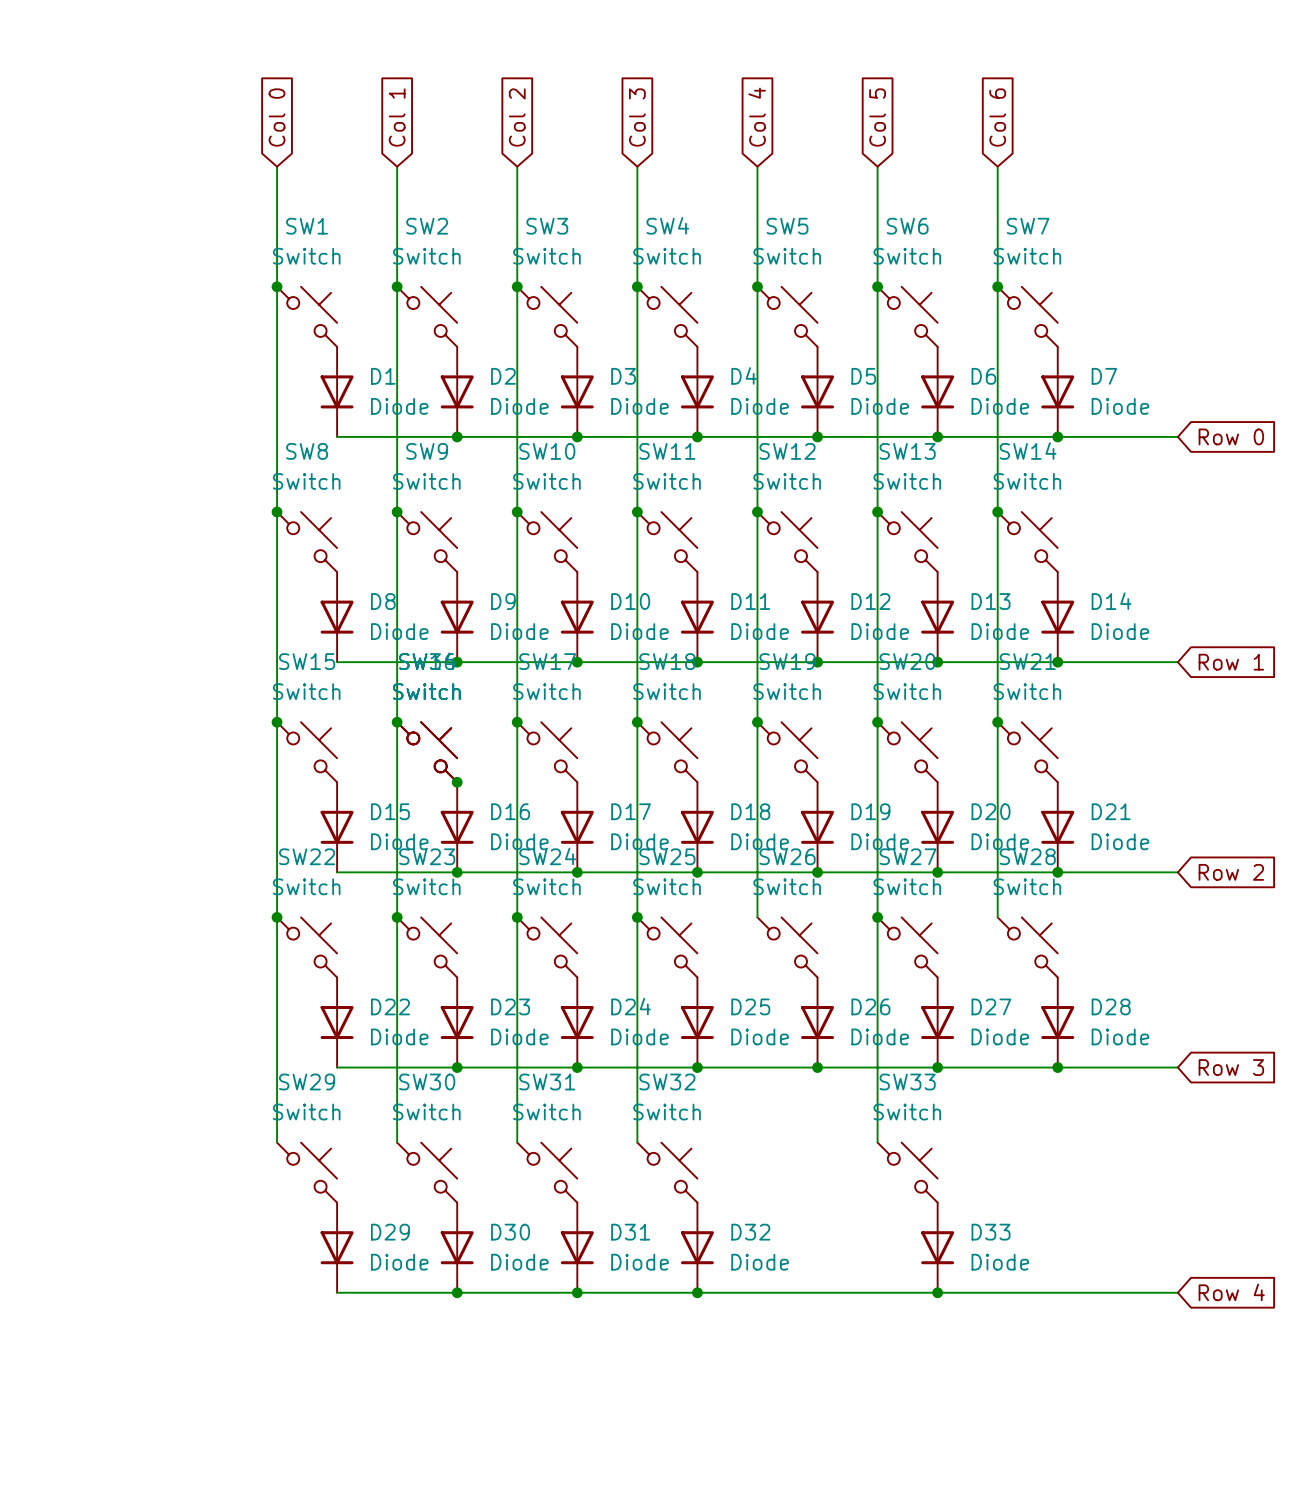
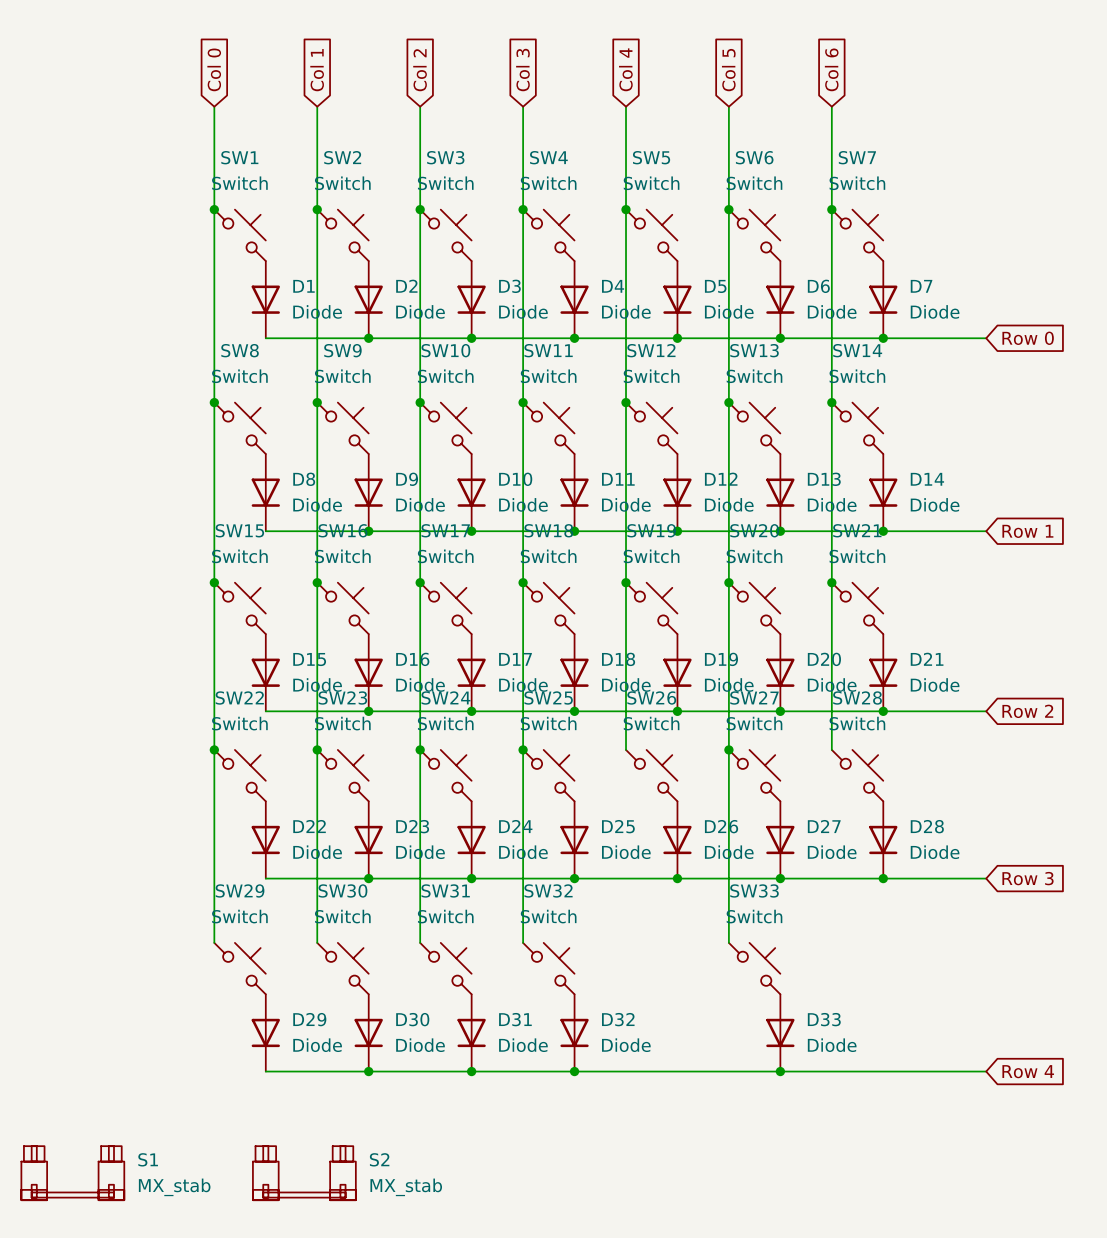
part: Switch (427, 752) -> none
junction: (457, 782) -> none
S1: none -> MX_stab (72, 1173)
S2: none -> MX_stab (304, 1173)

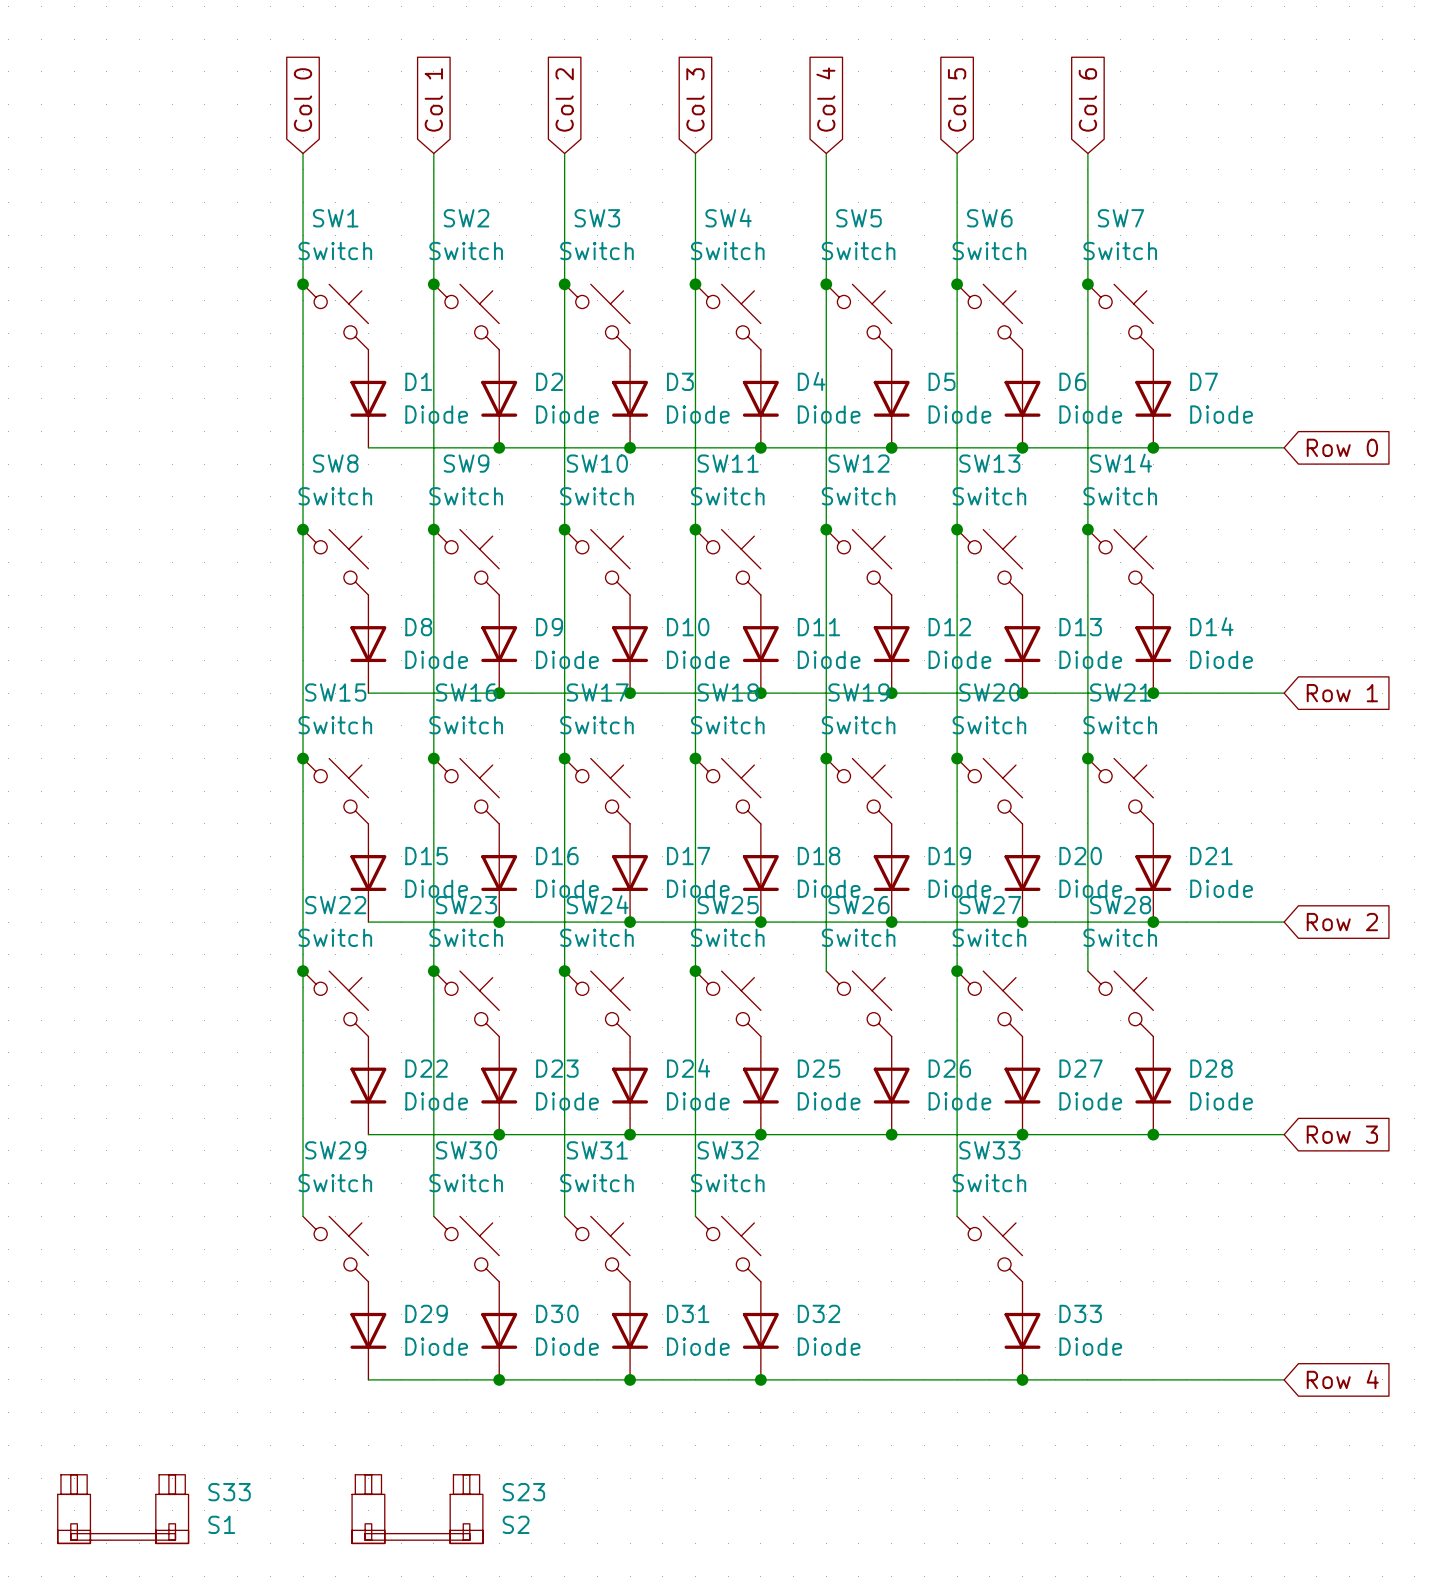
S1 name: S1 (148, 1159) -> S33 (229, 1492)
S2 name: S2 (379, 1159) -> S23 (523, 1492)
S1 value: MX_stab (174, 1187) -> S1 (221, 1524)
S2 value: MX_stab (406, 1187) -> S2 (516, 1524)

